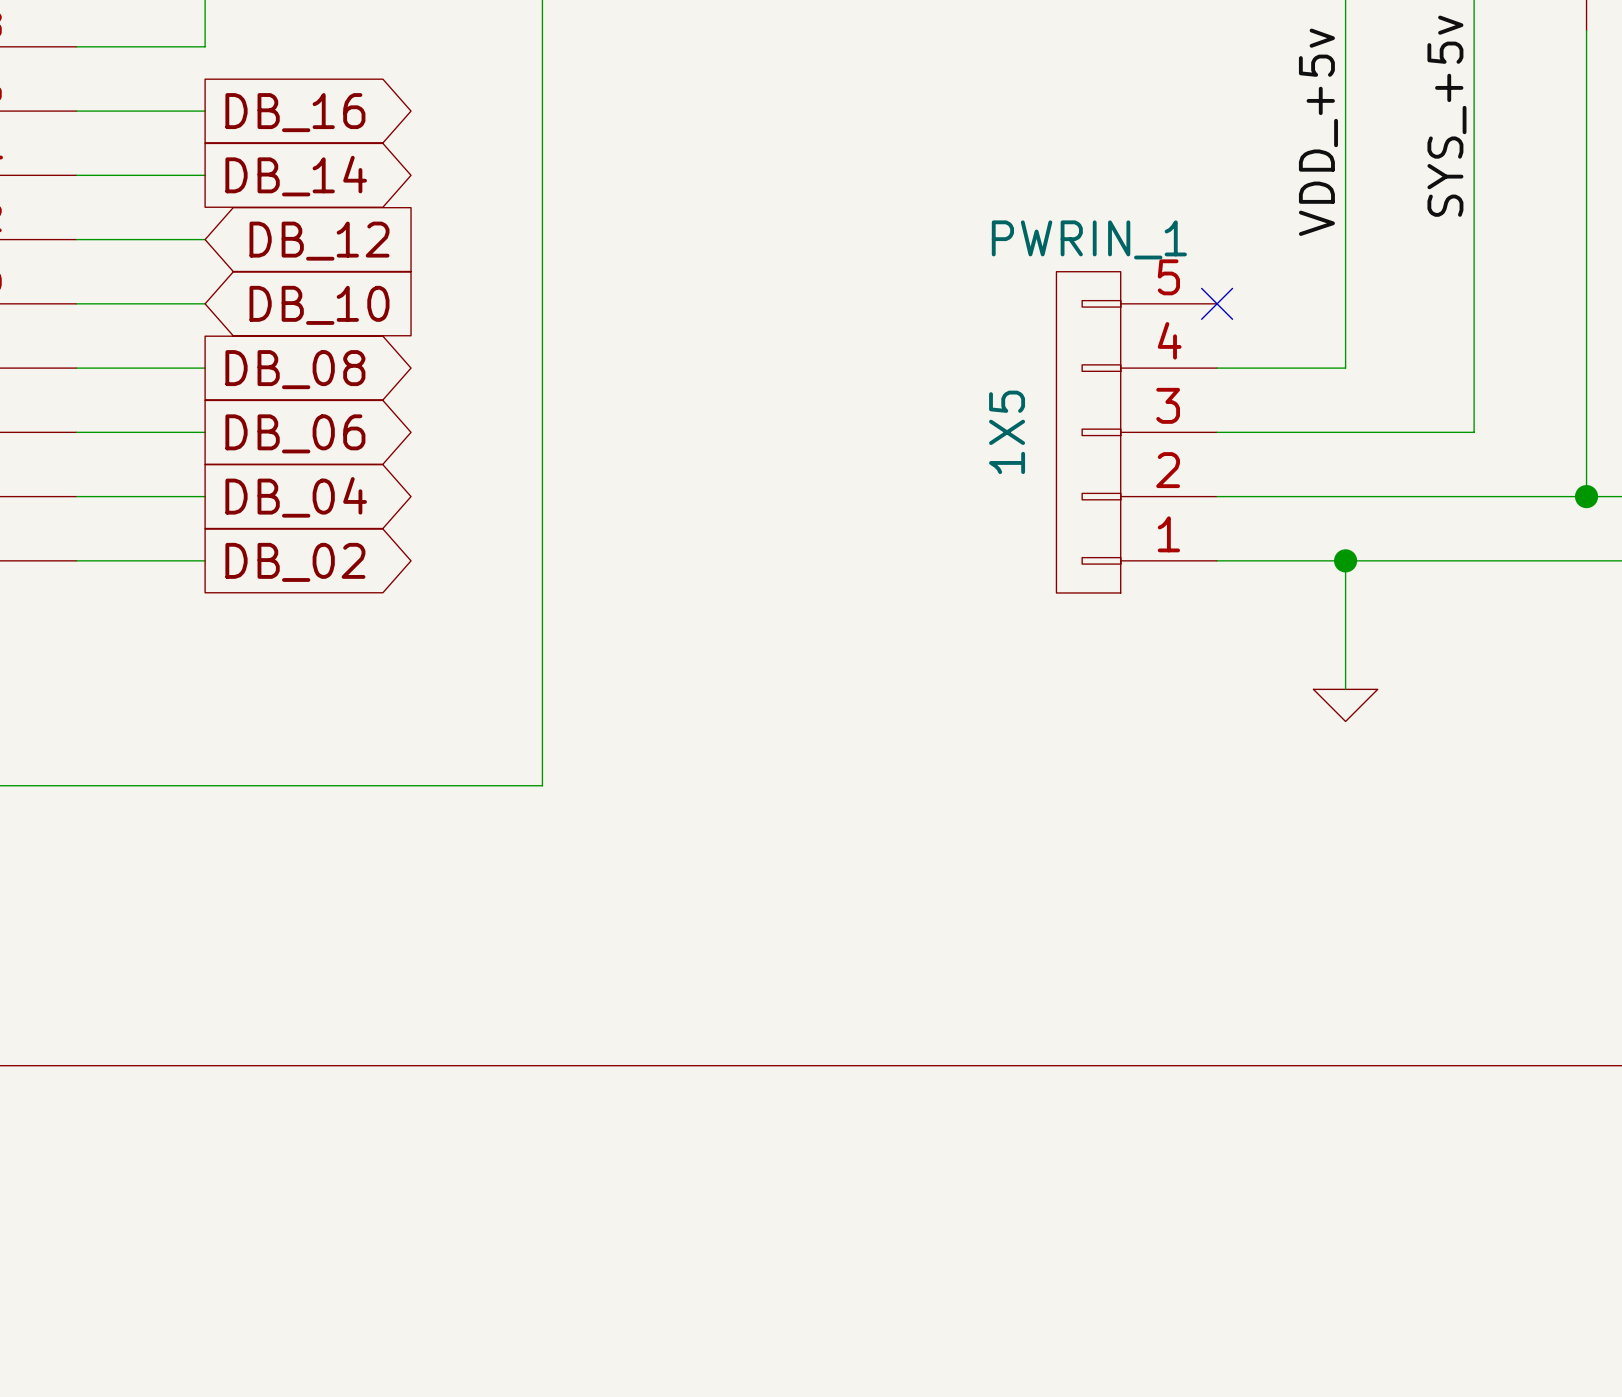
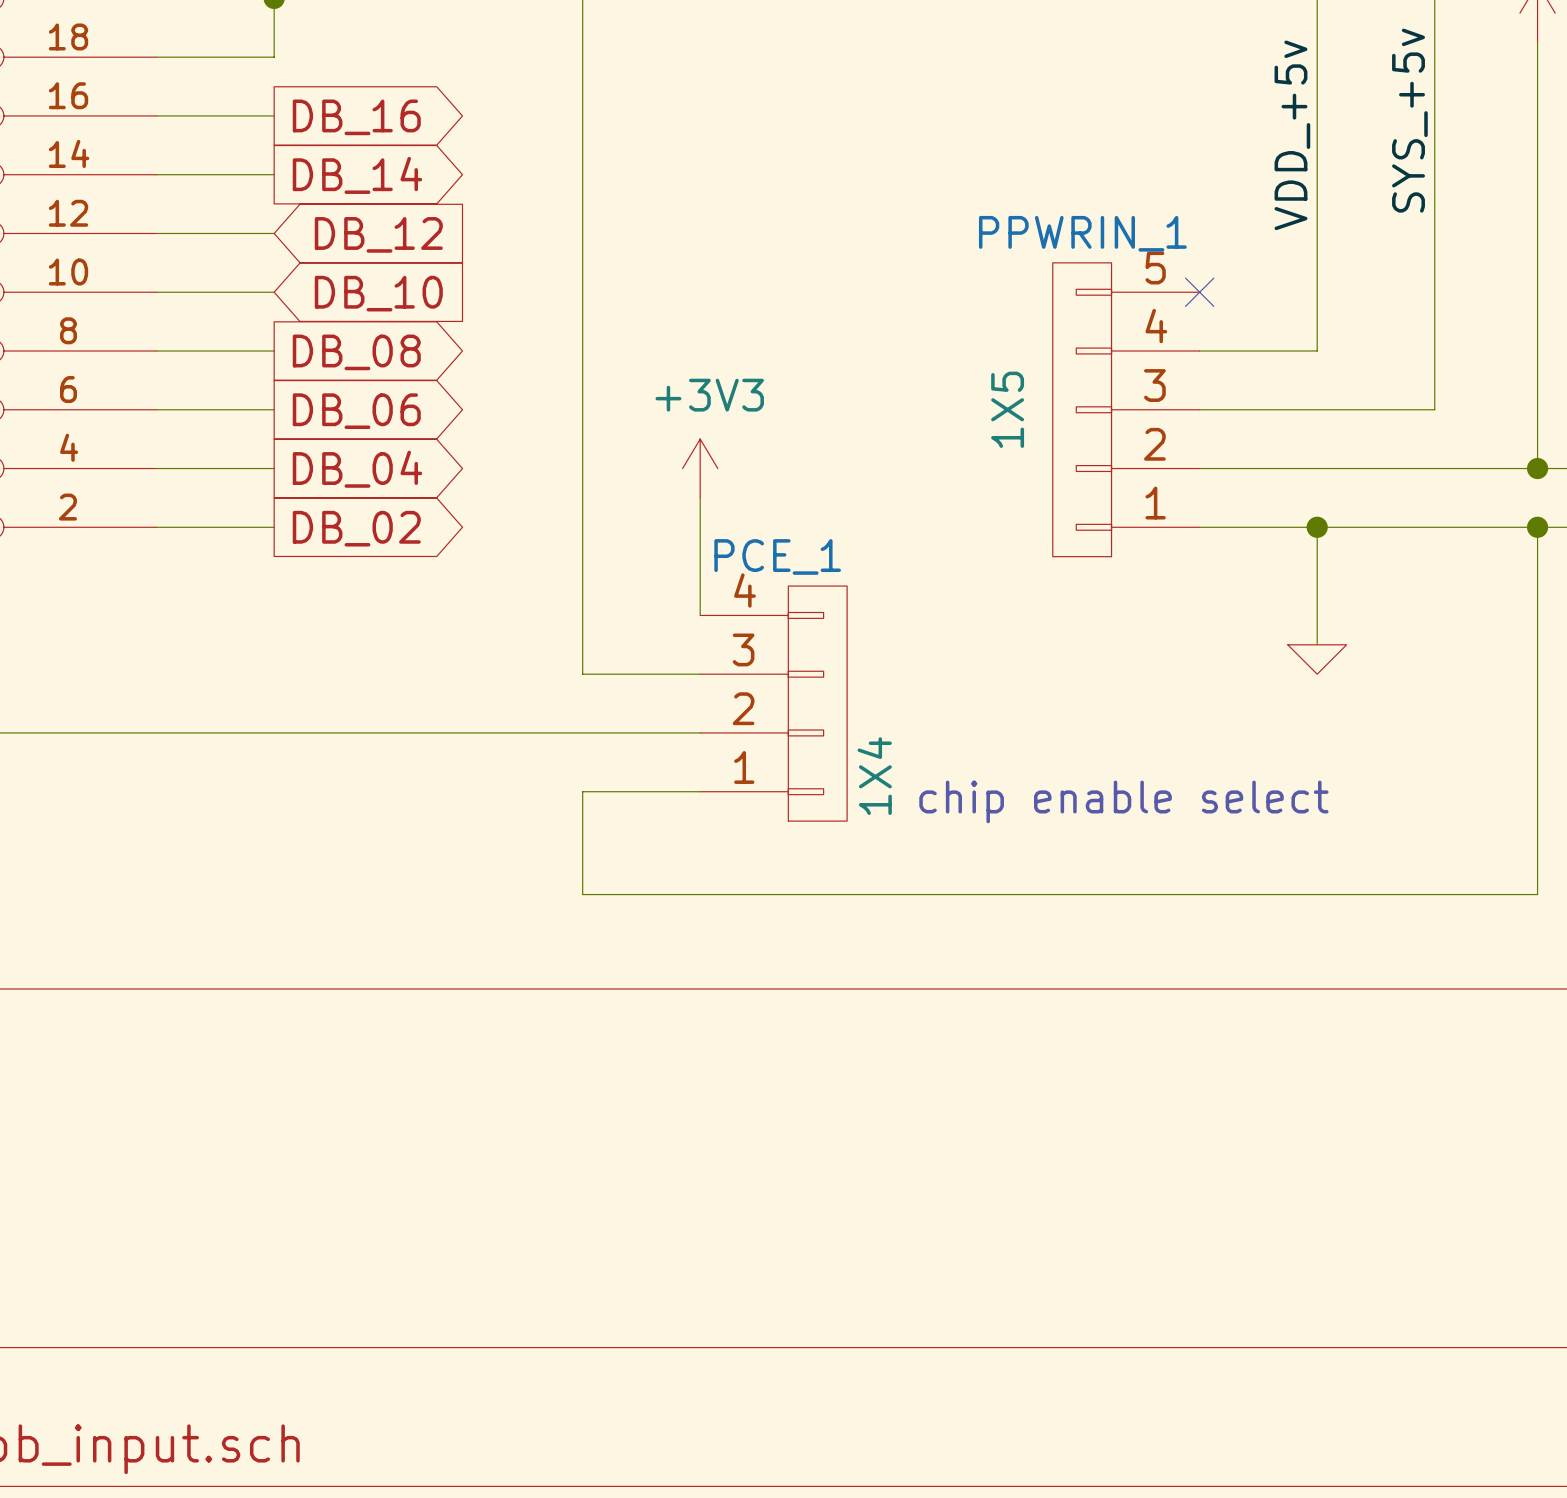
PWRIN_1 name: PWRIN_1 (1089, 239) -> PPWRIN_1 (1082, 233)
power symbol: none -> +3V3 (700, 468)
wire: none -> (700, 497) (700, 615)
wire: none -> (1537, 527) (1537, 894) (582, 894) (582, 791) (700, 791)
junction: none -> (1537, 527)
wire: (542, 721) (542, 785) -> (582, 674) (700, 674)
PCE_1: none -> 1X4 (773, 703)
wire: none -> (582, 732) (700, 732)
text: none -> chip enable select (1123, 801)

